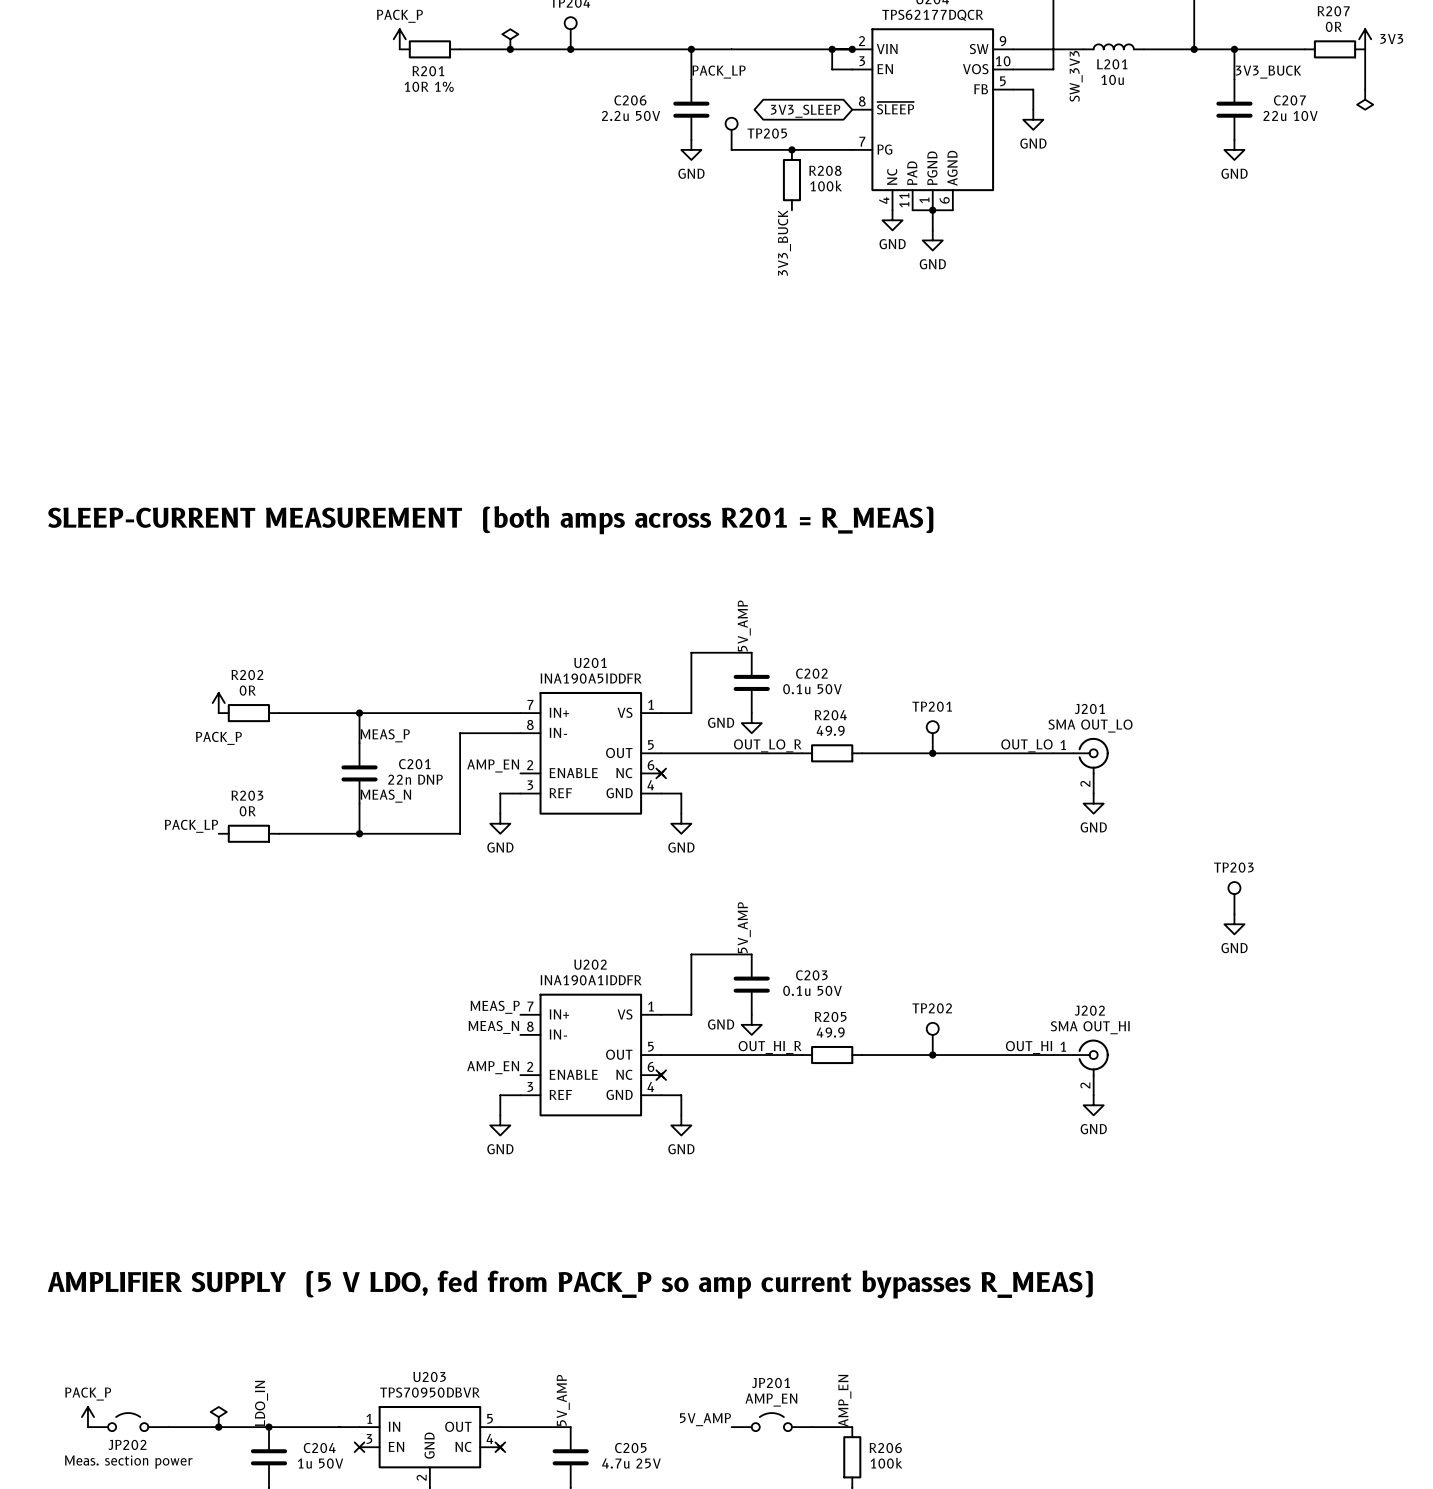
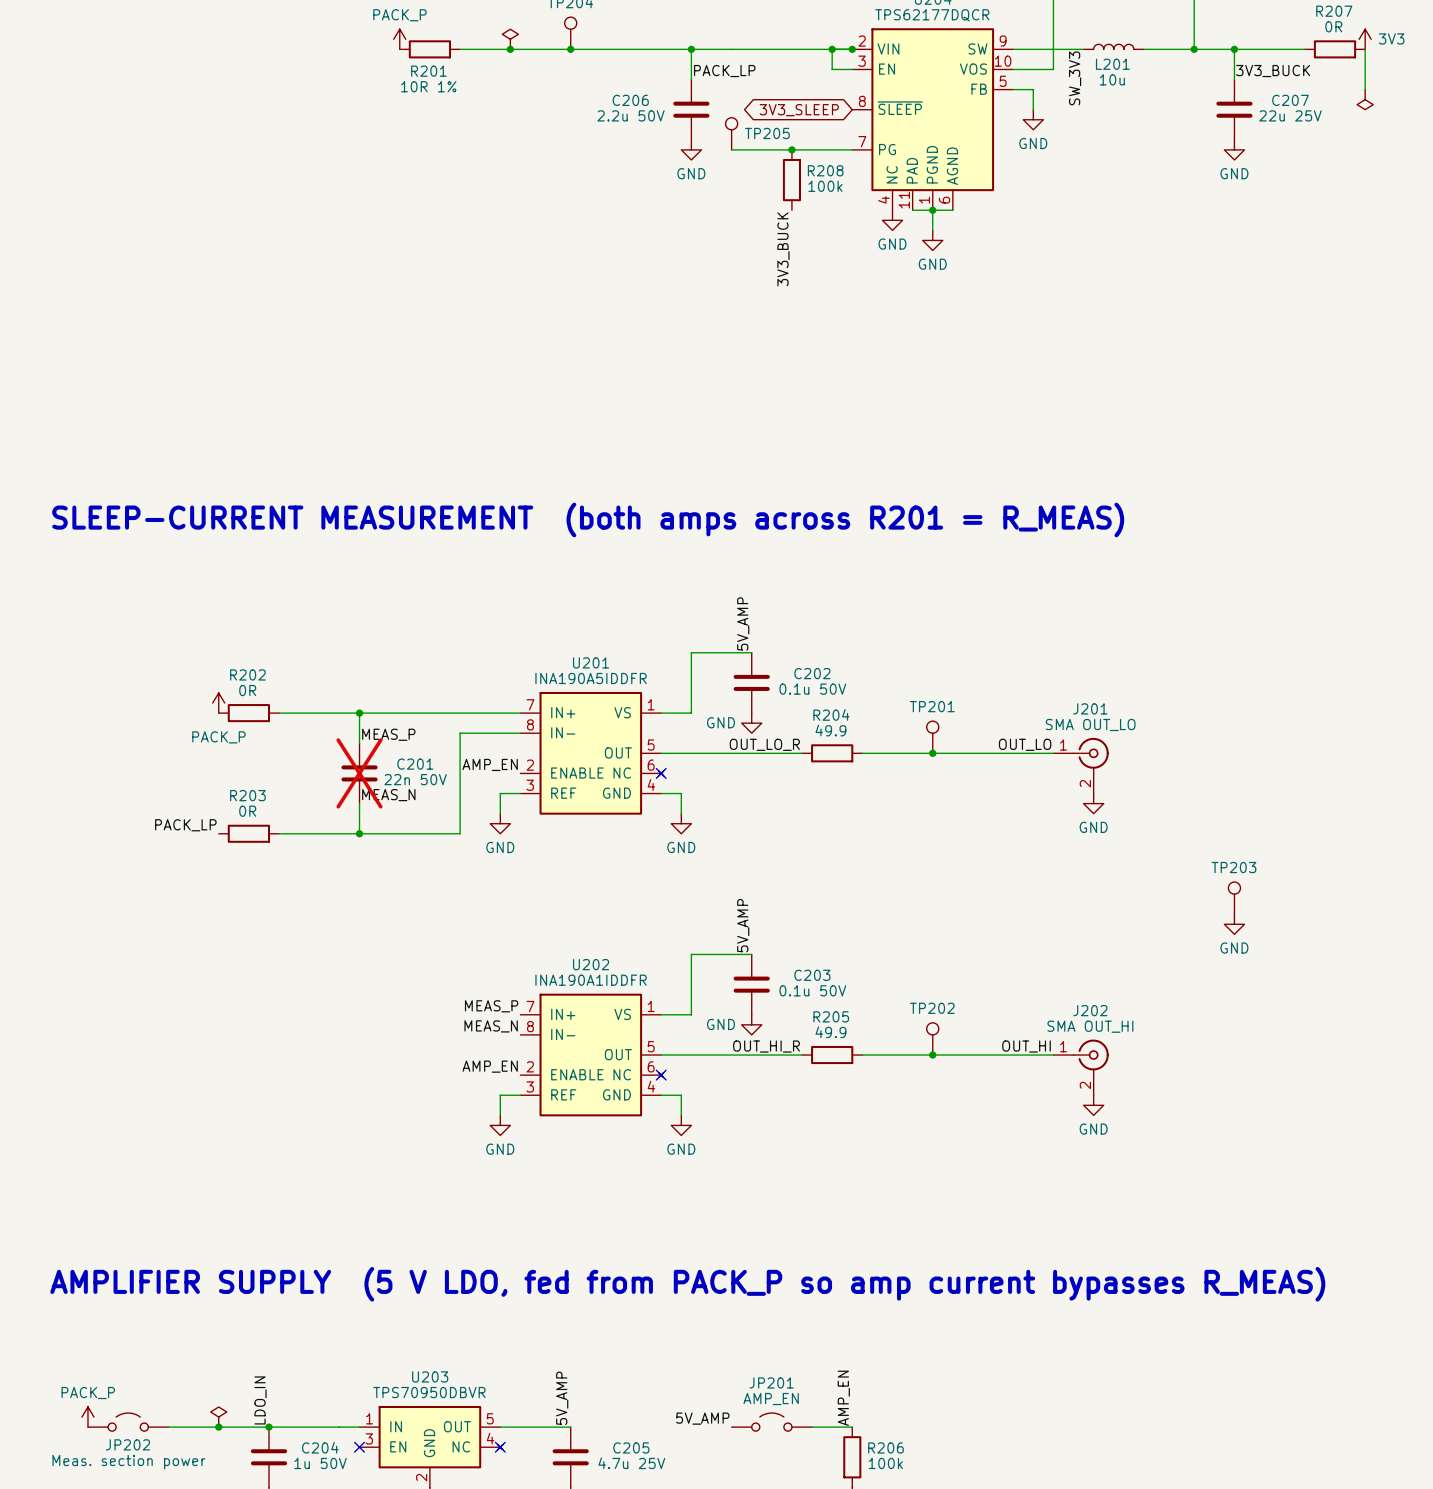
C207 value: 22u 10V (1290, 115) -> 22u 25V (1290, 115)
C201 do-not-place cross: none -> (359, 773)
C201 value: 22n DNP (415, 779) -> 22n 50V (415, 779)

